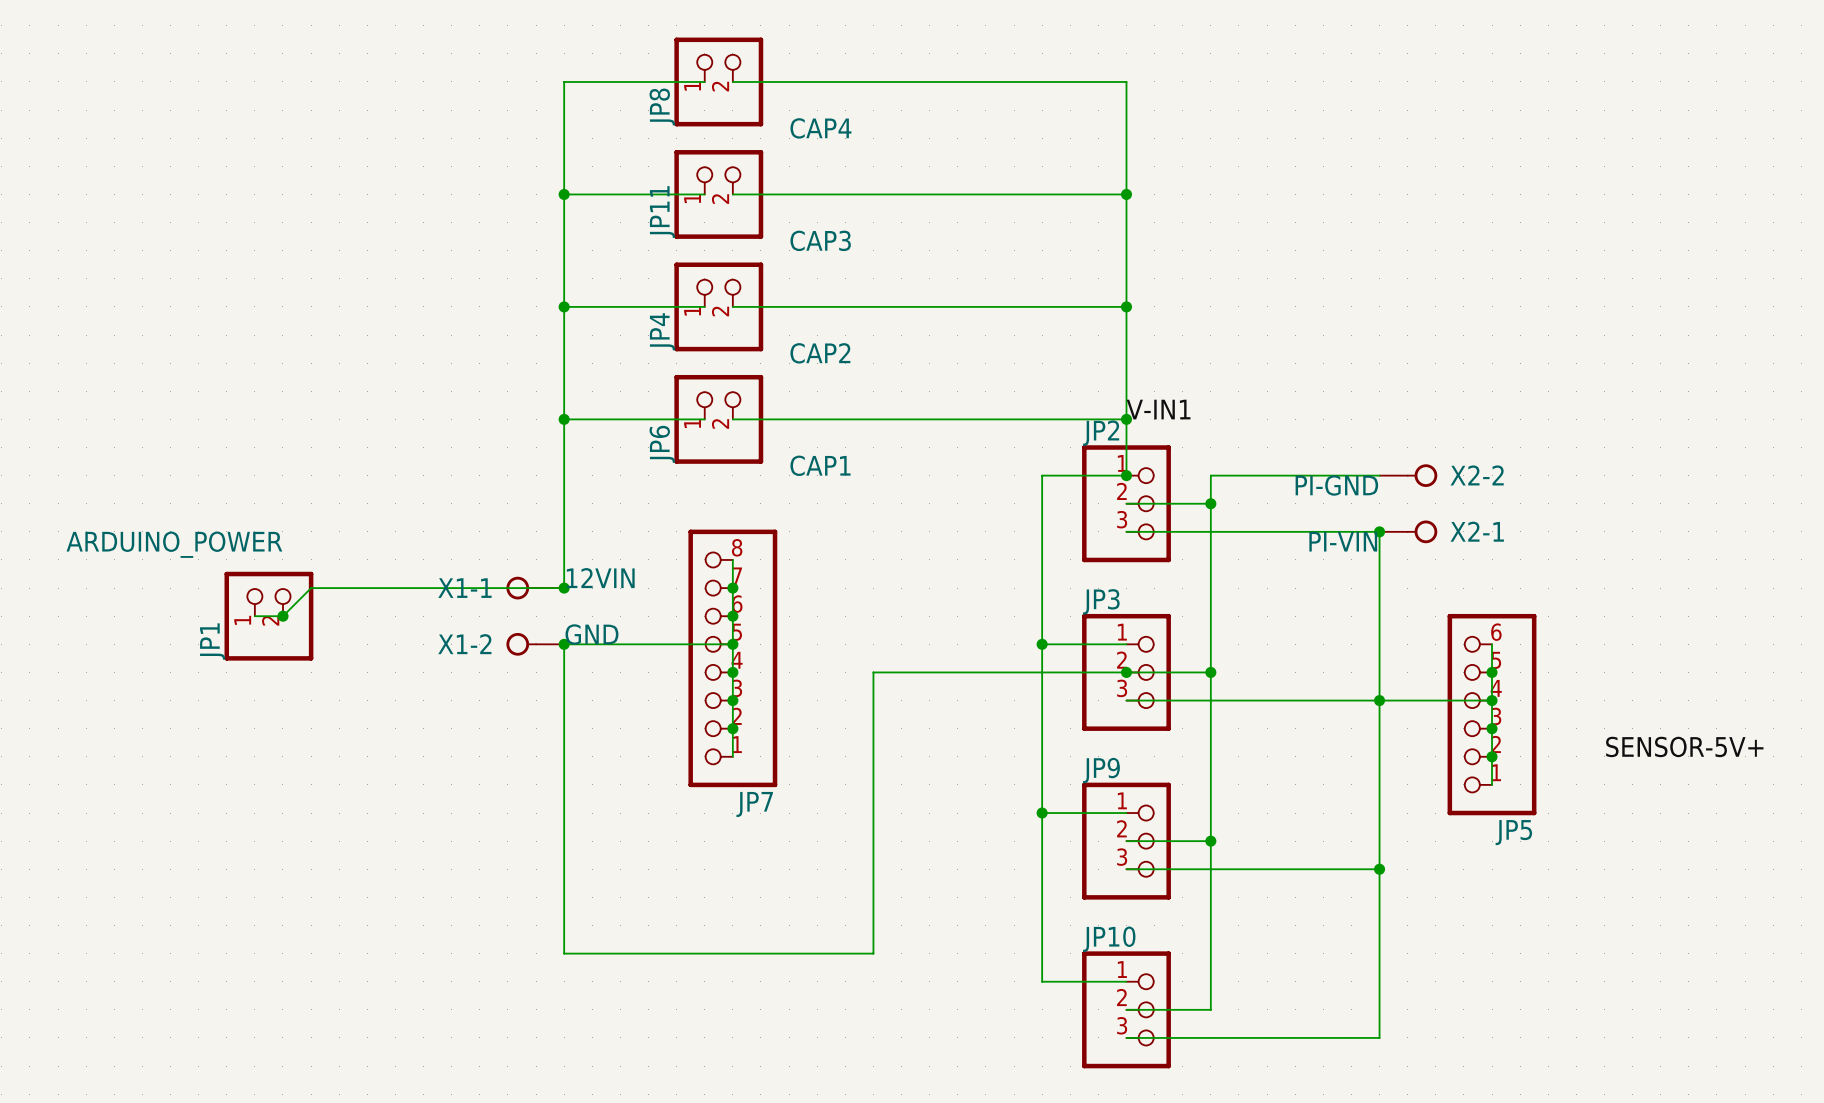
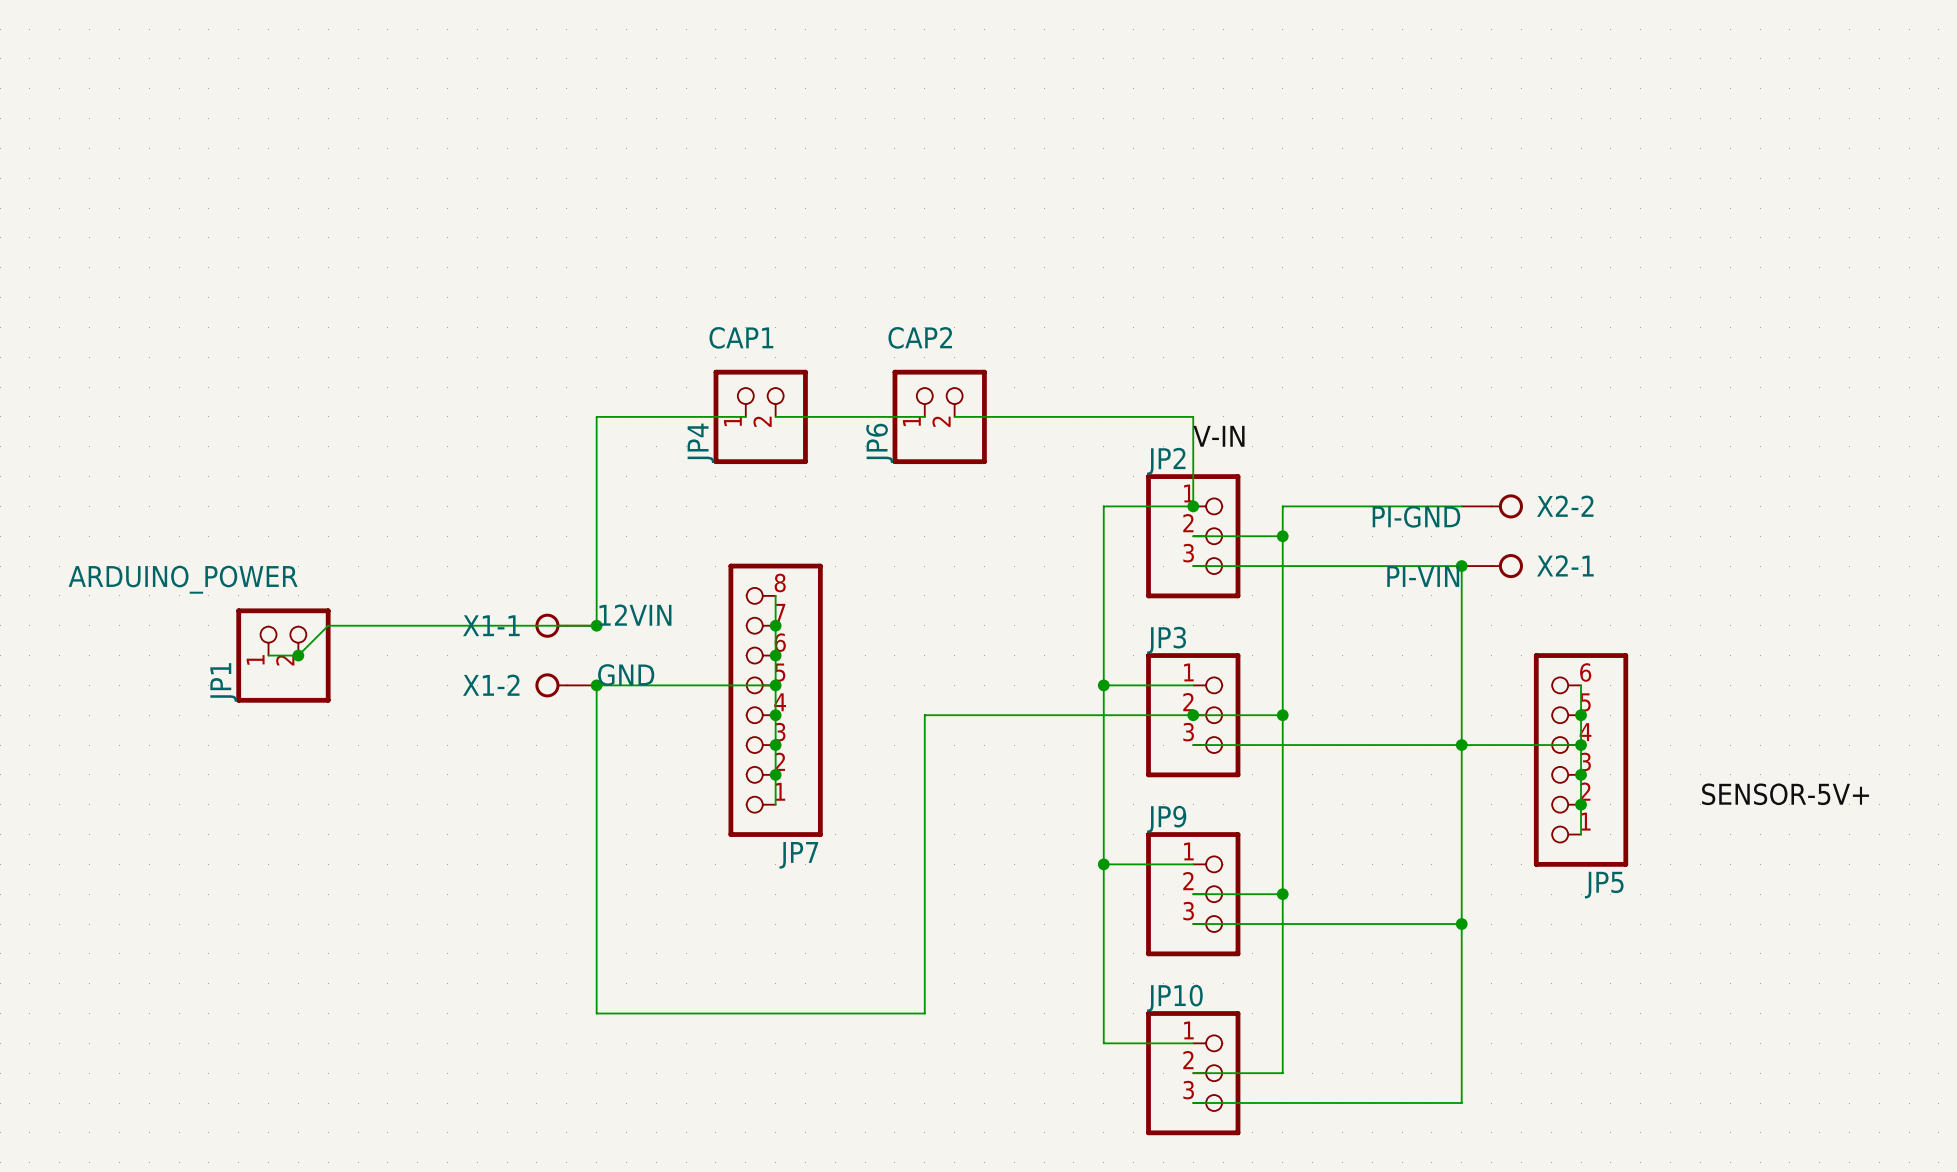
wire: (704, 81) (564, 81) (564, 391) -> (745, 416) (596, 416)
JP8: (718, 81) -> none
wire: (732, 81) (1126, 81) (1126, 391) -> (954, 416) (1193, 416)
wire: (564, 194) (704, 194) -> none
junction: (564, 194) -> none
JP11: (718, 194) -> none
wire: (732, 194) (1126, 194) -> none
junction: (1126, 194) -> none
wire: (564, 306) (704, 306) -> none
junction: (564, 306) -> none
JP4 position: (718, 306) -> (760, 416)
wire: (732, 306) (1126, 306) -> none
junction: (1126, 306) -> none
JP4 text: none -> CAP1 (741, 337)
JP6 text: none -> CAP2 (920, 337)
JP4 text: CAP2 (820, 353) -> none
label: V-IN1 (1158, 409) -> V-IN (1218, 436)
wire: (564, 419) (704, 419) -> (775, 416) (924, 416)
junction: (564, 419) -> none
JP6 position: (718, 419) -> (939, 416)
wire: (732, 419) (1126, 419) -> none
junction: (1126, 419) -> none
JP6 text: CAP1 (820, 465) -> none

